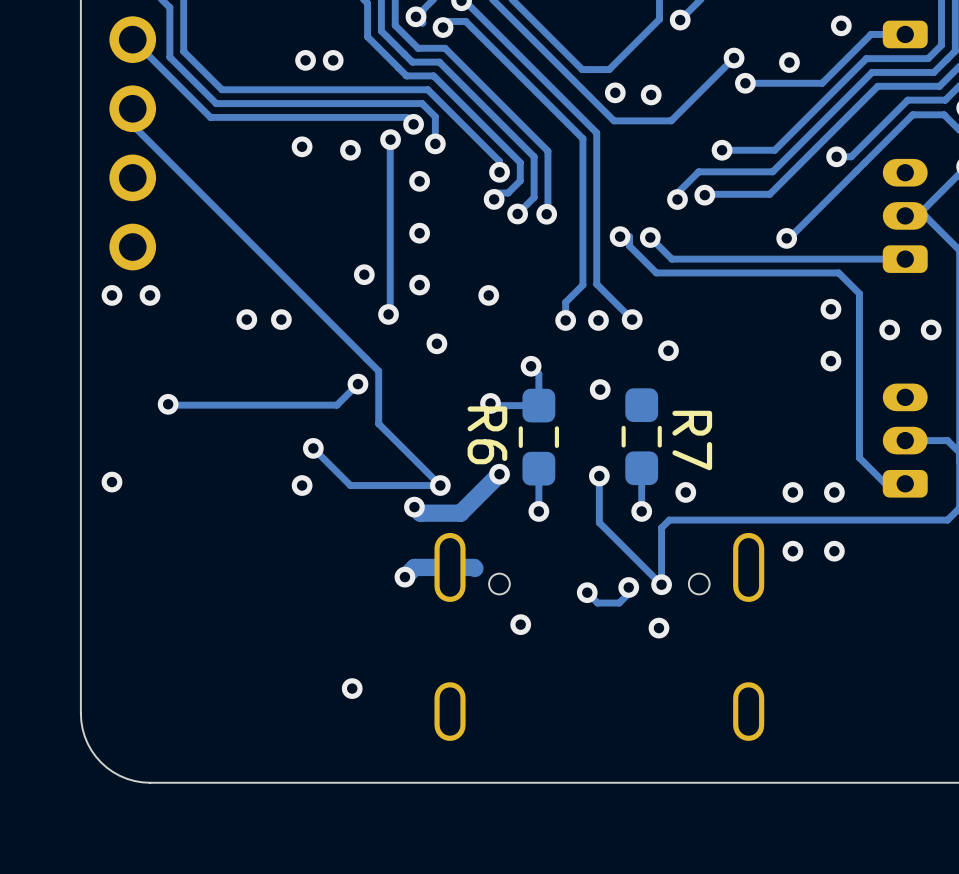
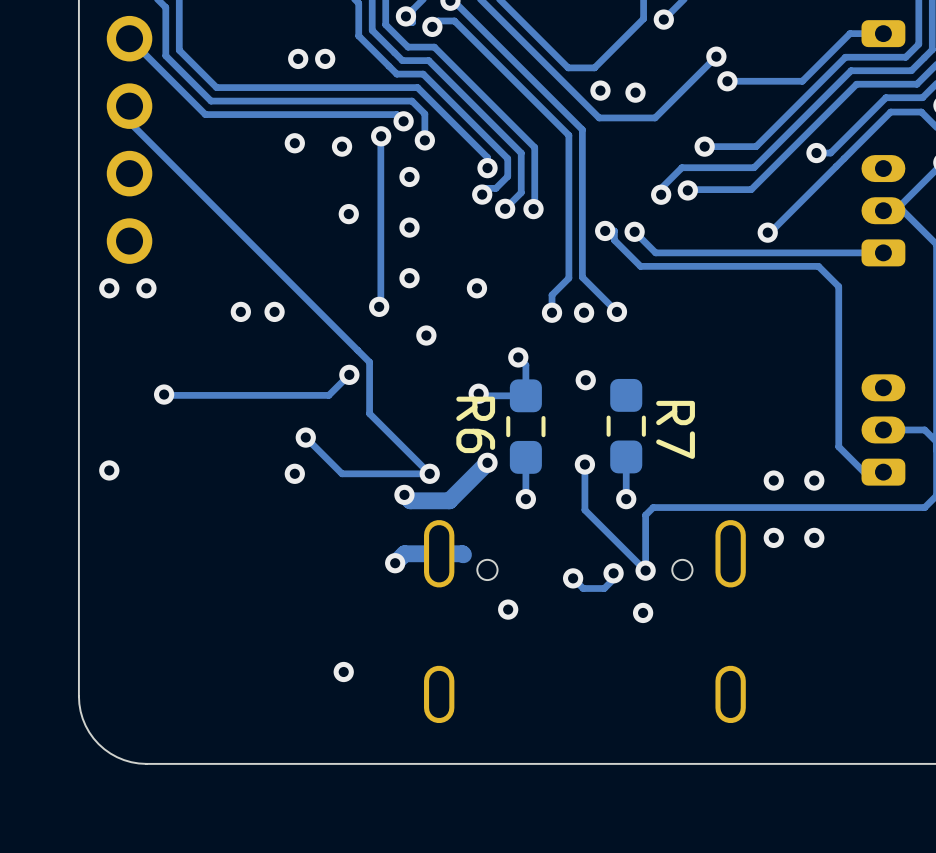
via: (841, 25) -> none
via: (789, 62) -> none
via position: (364, 274) -> (348, 214)
via: (830, 309) -> none
via: (889, 329) -> none
via: (931, 329) -> none
via: (668, 350) -> none
via: (830, 361) -> none
via: (685, 492) -> none

